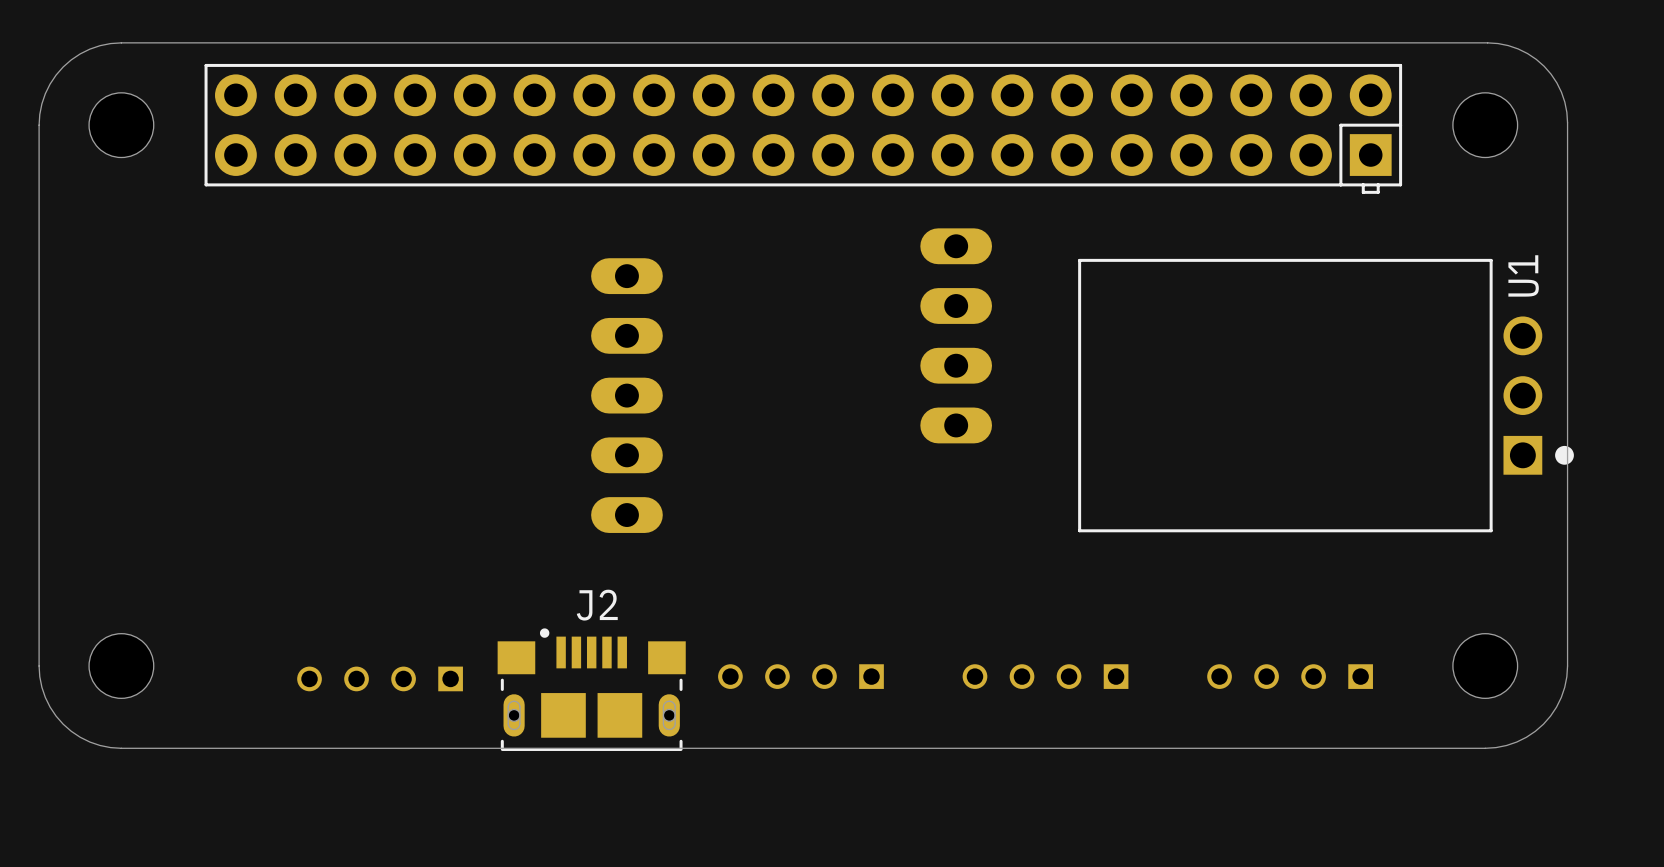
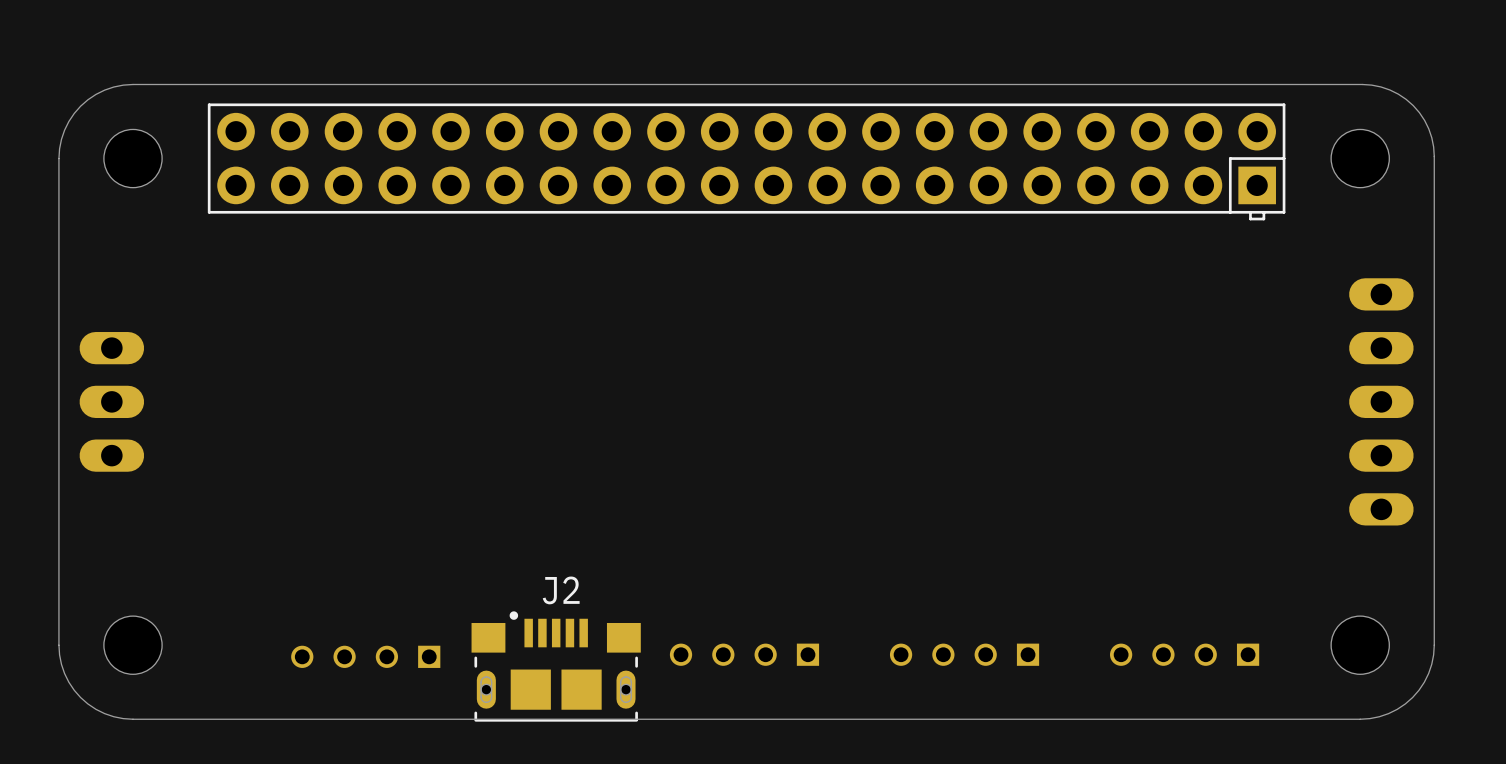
part: (956, 335) -> none
part: none -> (111, 401)
part: (626, 395) -> none
U1: (1326, 395) -> none
part: none -> (1381, 401)

